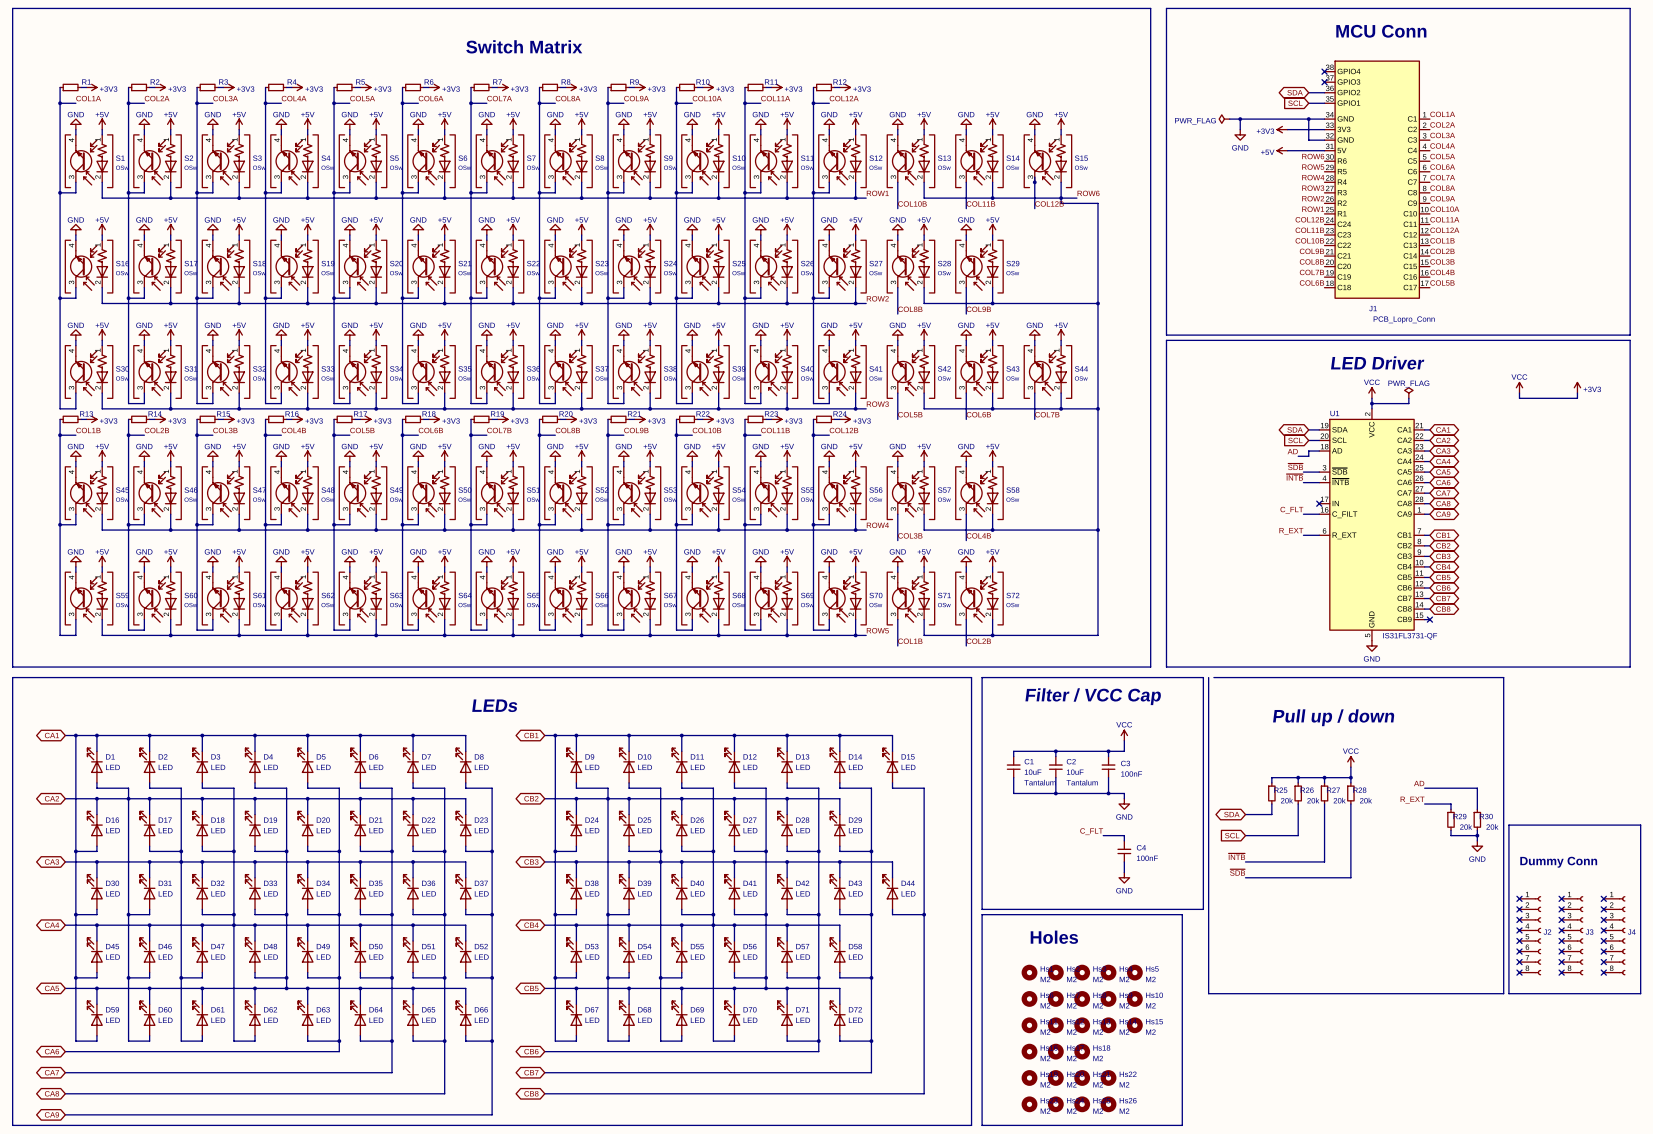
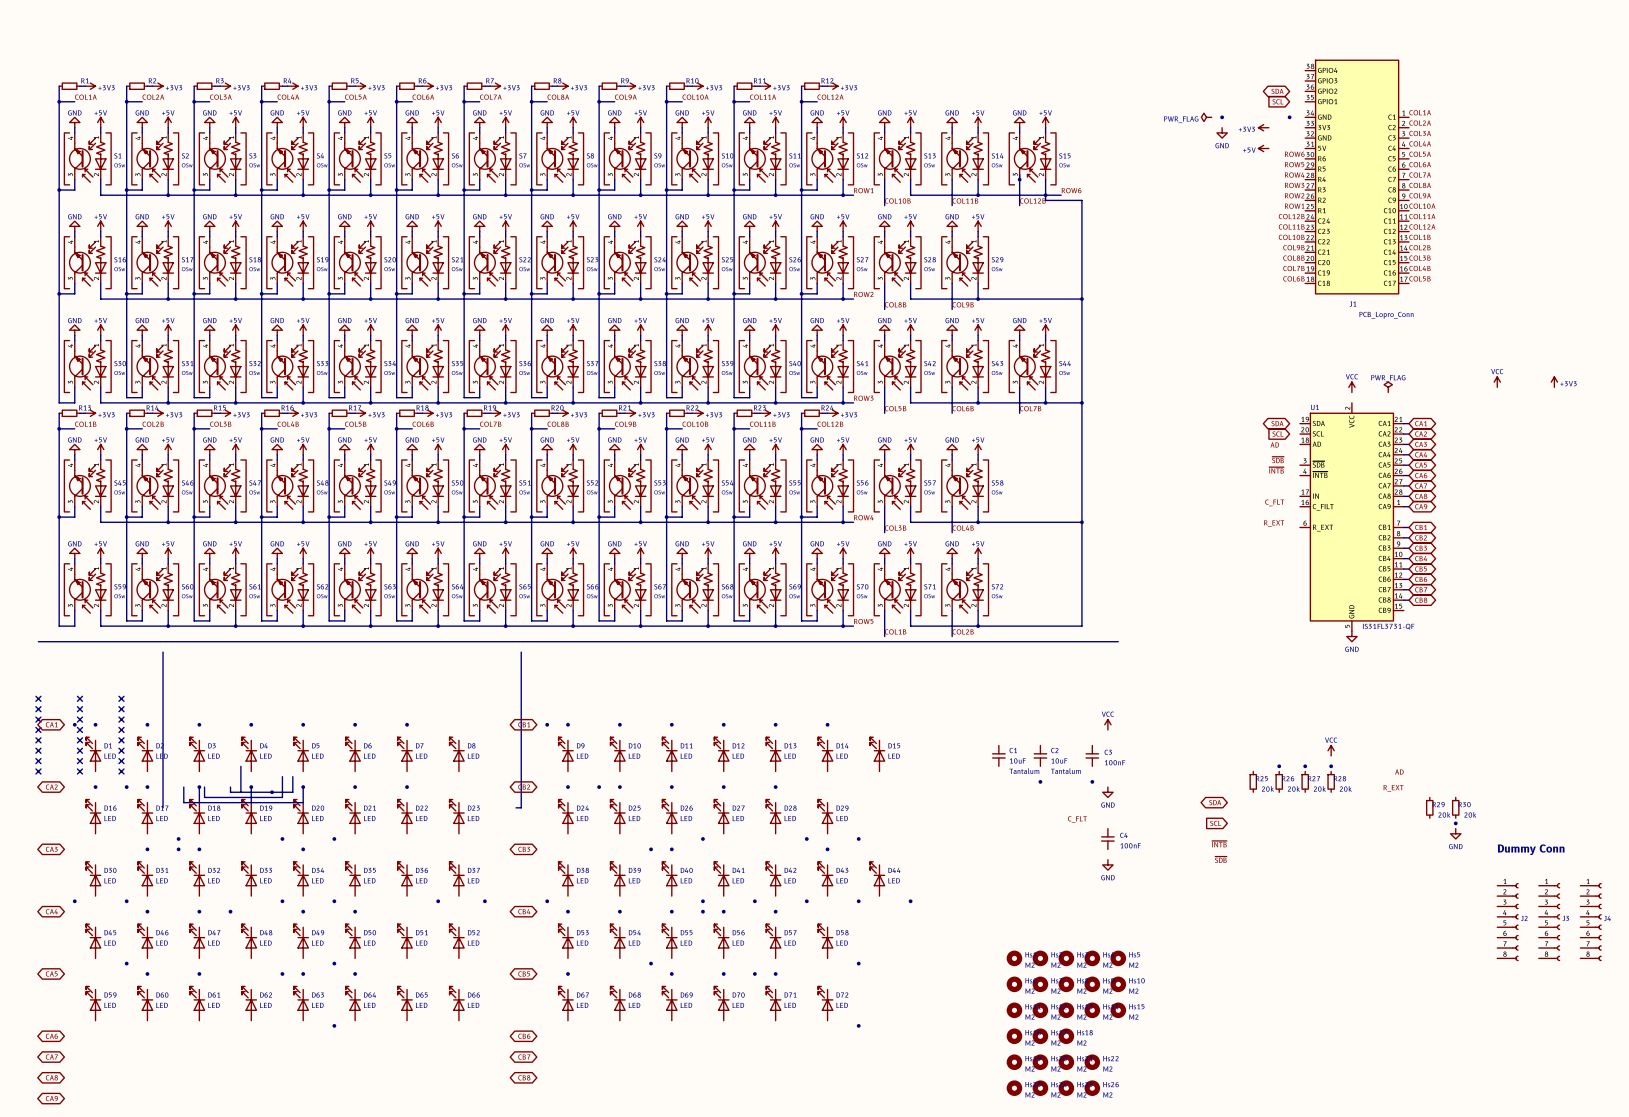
line: (12, 8) (1150, 8) (1150, 667) (12, 667) (12, 8) -> none
line: (1166, 8) (1630, 8) (1630, 335) (1166, 335) (1166, 8) -> none
text: MCU Conn (1381, 31) -> none
text: Switch Matrix (524, 46) -> none
no-connect mark: (1324, 71) -> none
no-connect mark: (1324, 82) -> none
wire: (1308, 92) (1324, 92) -> none
wire: (1308, 103) (1324, 103) -> none
wire: (1229, 119) (1324, 119) -> none
wire: (1240, 119) (1240, 129) -> none
wire: (1308, 119) (1308, 140) (1324, 140) -> none
wire: (1287, 129) (1324, 129) -> none
wire: (1287, 150) (1324, 150) -> none
line: (1166, 340) (1630, 340) (1630, 667) (1166, 667) (1166, 340) -> none
text: LED Driver (1377, 362) -> none
wire: (1519, 393) (1519, 398) (1577, 398) (1577, 393) -> none
wire: (1371, 398) (1371, 408) -> none
wire: (1408, 398) (1408, 403) (1371, 403) -> none
junction: (1371, 403) -> none
wire: (1308, 429) (1319, 429) -> none
wire: (1308, 440) (1319, 440) -> none
wire: (1319, 451) (1308, 451) (1308, 456) (1298, 456) -> none
wire: (1303, 472) (1319, 472) -> none
wire: (1303, 482) (1319, 482) -> none
no-connect mark: (1319, 503) -> none
wire: (1303, 514) (1319, 514) -> none
wire: (1303, 535) (1319, 535) -> none
wire: (1424, 619) (1429, 619) -> none
no-connect mark: (1429, 619) -> none
line: none -> (38, 641) (1118, 641)
line: none -> (163, 652) (163, 807)
line: none -> (521, 652) (521, 807) (516, 807)
line: (12, 677) (971, 677) (971, 1125) (12, 1125) (12, 677) -> none
line: (982, 677) (1203, 677) (1203, 909) (982, 909) (982, 677) -> none
line: (1208, 677) (1208, 993) (1503, 993) (1503, 677) (1213, 677) -> none
text: Filter / VCC Cap (1093, 696) -> none
text: LEDs (494, 705) -> none
no-connect mark: none -> (38, 698)
no-connect mark: none -> (79, 698)
no-connect mark: none -> (121, 698)
text: Pull up / down (1333, 717) -> none
no-connect mark: none -> (38, 709)
no-connect mark: none -> (79, 709)
no-connect mark: none -> (121, 709)
no-connect mark: none -> (38, 719)
no-connect mark: none -> (79, 719)
no-connect mark: none -> (121, 719)
wire: (65, 735) (465, 735) (465, 751) -> none
wire: (75, 735) (75, 1041) (96, 1041) (96, 1035) -> none
wire: (96, 735) (96, 751) -> none
wire: (149, 735) (149, 751) -> none
wire: (202, 735) (202, 751) -> none
wire: (255, 735) (255, 751) -> none
wire: (307, 735) (307, 751) -> none
wire: (360, 735) (360, 751) -> none
wire: (413, 735) (413, 751) -> none
wire: (544, 735) (892, 735) (892, 751) -> none
wire: (555, 735) (555, 1041) (576, 1041) (576, 1035) -> none
wire: (576, 735) (576, 751) -> none
wire: (629, 735) (629, 751) -> none
wire: (681, 735) (681, 751) -> none
wire: (734, 735) (734, 751) -> none
wire: (787, 735) (787, 751) -> none
wire: (839, 735) (839, 751) -> none
no-connect mark: none -> (38, 729)
no-connect mark: none -> (79, 729)
no-connect mark: none -> (121, 729)
wire: (1124, 740) (1124, 751) (1013, 751) (1013, 756) -> none
no-connect mark: none -> (38, 740)
no-connect mark: none -> (79, 740)
no-connect mark: none -> (121, 740)
wire: (1055, 751) (1055, 756) -> none
junction: (1055, 751) -> none
wire: (1108, 751) (1108, 756) -> none
junction: (1108, 751) -> none
no-connect mark: none -> (38, 750)
no-connect mark: none -> (79, 750)
no-connect mark: none -> (121, 750)
wire: (1350, 767) (1350, 782) -> none
no-connect mark: none -> (38, 761)
no-connect mark: none -> (79, 761)
no-connect mark: none -> (121, 761)
wire: none -> (240, 766) (240, 792)
wire: (1013, 777) (1013, 793) (1124, 793) (1124, 798) -> none
wire: (1055, 777) (1055, 793) -> none
wire: (1108, 777) (1108, 793) -> none
wire: (1298, 777) (1298, 782) -> none
wire: (1324, 777) (1324, 782) -> none
wire: (1350, 777) (1271, 777) (1271, 782) -> none
no-connect mark: none -> (38, 771)
no-connect mark: none -> (79, 771)
wire: (96, 782) (96, 788) (128, 788) (128, 1041) (149, 1041) (149, 1035) -> none
no-connect mark: none -> (121, 771)
wire: (149, 782) (149, 788) (181, 788) (181, 1041) (202, 1041) (202, 1035) -> none
wire: (202, 782) (202, 788) (233, 788) (233, 798) -> none
wire: (255, 782) (255, 788) (286, 788) -> none
wire: (307, 782) (307, 788) (339, 788) (339, 1051) (65, 1051) -> none
wire: (360, 782) (360, 788) (391, 788) (391, 1072) (65, 1072) -> none
wire: (413, 782) (413, 788) (444, 788) (444, 1093) (65, 1093) -> none
wire: (465, 782) (465, 788) (492, 788) (492, 1114) (65, 1114) -> none
wire: (576, 782) (576, 788) (608, 788) (608, 1041) (629, 1041) (629, 1035) -> none
wire: (629, 782) (629, 788) (660, 788) (660, 1041) (681, 1041) (681, 1035) -> none
wire: (681, 782) (681, 788) (713, 788) (713, 1041) (734, 1041) (734, 1035) -> none
wire: (734, 782) (734, 788) (766, 788) (766, 988) -> none
wire: (787, 782) (787, 788) (818, 788) (818, 1051) (544, 1051) -> none
wire: (839, 782) (839, 788) (871, 788) (871, 1072) (544, 1072) -> none
wire: (892, 782) (892, 788) (924, 788) (924, 1093) (544, 1093) -> none
wire: (1424, 788) (1477, 788) (1477, 809) -> none
wire: (65, 798) (465, 798) (465, 814) -> none
wire: (96, 798) (96, 814) -> none
wire: (149, 798) (149, 814) -> none
wire: none -> (183, 787) (183, 802) (303, 802)
wire: (360, 798) (360, 814) -> none
wire: (413, 798) (413, 814) -> none
wire: (544, 798) (839, 798) (839, 814) -> none
wire: (576, 798) (576, 814) -> none
wire: (629, 798) (629, 814) -> none
wire: (681, 798) (681, 814) -> none
wire: (734, 798) (734, 814) -> none
wire: (787, 798) (787, 814) -> none
wire: (233, 804) (233, 1041) (255, 1041) (255, 1035) -> (230, 792) (292, 792) (292, 776)
junction: none -> (272, 792)
wire: (1271, 804) (1271, 814) (1245, 814) -> none
wire: (1298, 804) (1298, 835) (1245, 835) -> none
wire: (1324, 804) (1324, 861) (1245, 861) -> none
wire: (1350, 804) (1350, 877) (1245, 877) -> none
wire: (1424, 804) (1450, 804) (1450, 809) -> none
wire: (286, 809) (286, 988) -> (282, 797) (204, 797) (204, 787)
line: (1508, 825) (1640, 825) (1640, 993) (1508, 993) (1508, 825) -> none
wire: (1450, 830) (1450, 835) (1477, 835) -> none
wire: (1477, 830) (1477, 840) -> none
wire: (1103, 835) (1124, 835) (1124, 840) -> none
wire: (96, 846) (96, 851) (75, 851) -> none
wire: (149, 846) (149, 851) (181, 851) -> none
wire: (202, 846) (202, 851) (233, 851) -> none
wire: (255, 846) (255, 851) (286, 851) -> none
wire: (307, 846) (307, 851) (339, 851) -> none
wire: (360, 846) (360, 851) (391, 851) -> none
wire: (413, 846) (413, 851) (444, 851) -> none
wire: (465, 846) (465, 851) (492, 851) -> none
wire: (576, 846) (576, 851) (555, 851) -> none
wire: (629, 846) (629, 851) (660, 851) -> none
wire: (681, 846) (681, 851) (713, 851) -> none
wire: (734, 846) (734, 851) (766, 851) -> none
wire: (787, 846) (787, 851) (818, 851) -> none
wire: (839, 846) (839, 851) (871, 851) -> none
junction: (75, 851) -> none
junction: (233, 851) -> none
junction: (391, 851) -> none
junction: (444, 851) -> none
junction: (492, 851) -> none
junction: (555, 851) -> none
junction: (660, 851) -> none
junction: (766, 851) -> none
wire: (65, 861) (465, 861) (465, 877) -> none
wire: (96, 861) (96, 877) -> none
junction: (96, 861) -> none
wire: (149, 861) (149, 877) -> none
wire: (202, 861) (202, 877) -> none
wire: (255, 861) (255, 877) -> none
junction: (255, 861) -> none
wire: (307, 861) (307, 877) -> none
wire: (360, 861) (360, 877) -> none
junction: (360, 861) -> none
wire: (413, 861) (413, 877) -> none
junction: (413, 861) -> none
wire: (544, 861) (892, 861) (892, 877) -> none
wire: (576, 861) (576, 877) -> none
junction: (576, 861) -> none
wire: (629, 861) (629, 877) -> none
junction: (629, 861) -> none
wire: (681, 861) (681, 877) -> none
wire: (734, 861) (734, 877) -> none
junction: (734, 861) -> none
wire: (787, 861) (787, 877) -> none
junction: (787, 861) -> none
wire: (839, 861) (839, 877) -> none
wire: (1124, 861) (1124, 872) -> none
no-connect mark: (1519, 898) -> none
no-connect mark: (1561, 898) -> none
no-connect mark: (1603, 898) -> none
wire: (96, 909) (96, 914) (75, 914) -> none
wire: (149, 909) (149, 914) (128, 914) -> none
wire: (202, 909) (202, 914) (233, 914) -> none
wire: (255, 909) (255, 914) (286, 914) -> none
wire: (307, 909) (307, 914) (339, 914) -> none
wire: (360, 909) (360, 914) (391, 914) -> none
wire: (413, 909) (413, 914) (444, 914) -> none
wire: (465, 909) (465, 914) (492, 914) -> none
wire: (576, 909) (576, 914) (555, 914) -> none
wire: (629, 909) (629, 914) (608, 914) -> none
wire: (681, 909) (681, 914) (713, 914) -> none
wire: (734, 909) (734, 914) (766, 914) -> none
wire: (787, 909) (787, 914) (818, 914) -> none
wire: (839, 909) (839, 914) (871, 914) -> none
wire: (892, 909) (892, 914) (924, 914) -> none
no-connect mark: (1519, 909) -> none
no-connect mark: (1561, 909) -> none
no-connect mark: (1603, 909) -> none
junction: (233, 914) -> none
junction: (391, 914) -> none
junction: (608, 914) -> none
line: (982, 914) (982, 1125) (1182, 1125) (1182, 914) (982, 914) -> none
no-connect mark: (1519, 919) -> none
no-connect mark: (1561, 919) -> none
no-connect mark: (1603, 919) -> none
wire: (65, 925) (465, 925) (465, 941) -> none
wire: (96, 925) (96, 941) -> none
junction: (96, 925) -> none
wire: (149, 925) (149, 941) -> none
wire: (202, 925) (202, 941) -> none
wire: (255, 925) (255, 941) -> none
junction: (255, 925) -> none
wire: (307, 925) (307, 941) -> none
wire: (360, 925) (360, 941) -> none
wire: (413, 925) (413, 941) -> none
junction: (413, 925) -> none
wire: (544, 925) (839, 925) (839, 941) -> none
wire: (576, 925) (576, 941) -> none
wire: (629, 925) (629, 941) -> none
wire: (681, 925) (681, 941) -> none
wire: (734, 925) (734, 941) -> none
wire: (787, 925) (787, 941) -> none
no-connect mark: (1519, 930) -> none
no-connect mark: (1561, 930) -> none
no-connect mark: (1603, 930) -> none
text: Holes (1054, 937) -> none
no-connect mark: (1519, 941) -> none
no-connect mark: (1561, 941) -> none
no-connect mark: (1603, 941) -> none
no-connect mark: (1519, 951) -> none
no-connect mark: (1561, 951) -> none
no-connect mark: (1603, 951) -> none
no-connect mark: (1519, 962) -> none
no-connect mark: (1561, 962) -> none
no-connect mark: (1603, 962) -> none
wire: (96, 972) (96, 977) (75, 977) -> none
wire: (149, 972) (149, 977) (128, 977) -> none
wire: (202, 972) (202, 977) (181, 977) -> none
wire: (255, 972) (255, 977) (286, 977) -> none
wire: (307, 972) (307, 977) (339, 977) -> none
wire: (360, 972) (360, 977) (391, 977) -> none
wire: (413, 972) (413, 977) (444, 977) -> none
wire: (465, 972) (465, 977) (492, 977) -> none
wire: (576, 972) (576, 977) (555, 977) -> none
wire: (629, 972) (629, 977) (608, 977) -> none
wire: (681, 972) (681, 977) (660, 977) -> none
wire: (734, 972) (734, 977) (766, 977) -> none
wire: (787, 972) (787, 977) (818, 977) -> none
wire: (839, 972) (839, 977) (871, 977) -> none
no-connect mark: (1519, 972) -> none
no-connect mark: (1561, 972) -> none
no-connect mark: (1603, 972) -> none
junction: (75, 977) -> none
junction: (181, 977) -> none
junction: (286, 977) -> none
junction: (391, 977) -> none
junction: (444, 977) -> none
junction: (492, 977) -> none
junction: (555, 977) -> none
junction: (608, 977) -> none
junction: (766, 977) -> none
junction: (818, 977) -> none
wire: (65, 988) (465, 988) (465, 1004) -> none
wire: (96, 988) (96, 1004) -> none
junction: (96, 988) -> none
wire: (149, 988) (149, 1004) -> none
wire: (202, 988) (202, 1004) -> none
wire: (255, 988) (255, 1004) -> none
junction: (255, 988) -> none
wire: (307, 988) (307, 1004) -> none
wire: (360, 988) (360, 1004) -> none
wire: (413, 988) (413, 1004) -> none
junction: (413, 988) -> none
wire: (544, 988) (839, 988) (839, 1004) -> none
wire: (576, 988) (576, 1004) -> none
wire: (629, 988) (629, 1004) -> none
junction: (629, 988) -> none
wire: (681, 988) (681, 1004) -> none
wire: (734, 988) (734, 1004) -> none
wire: (787, 988) (787, 1004) -> none
wire: (307, 1035) (307, 1041) (339, 1041) -> none
wire: (360, 1035) (360, 1041) (391, 1041) -> none
wire: (413, 1035) (413, 1041) (444, 1041) -> none
wire: (465, 1035) (465, 1041) (492, 1041) -> none
wire: (787, 1035) (787, 1041) (818, 1041) -> none
wire: (839, 1035) (839, 1041) (871, 1041) -> none
junction: (391, 1041) -> none
junction: (444, 1041) -> none
junction: (492, 1041) -> none
junction: (818, 1041) -> none

